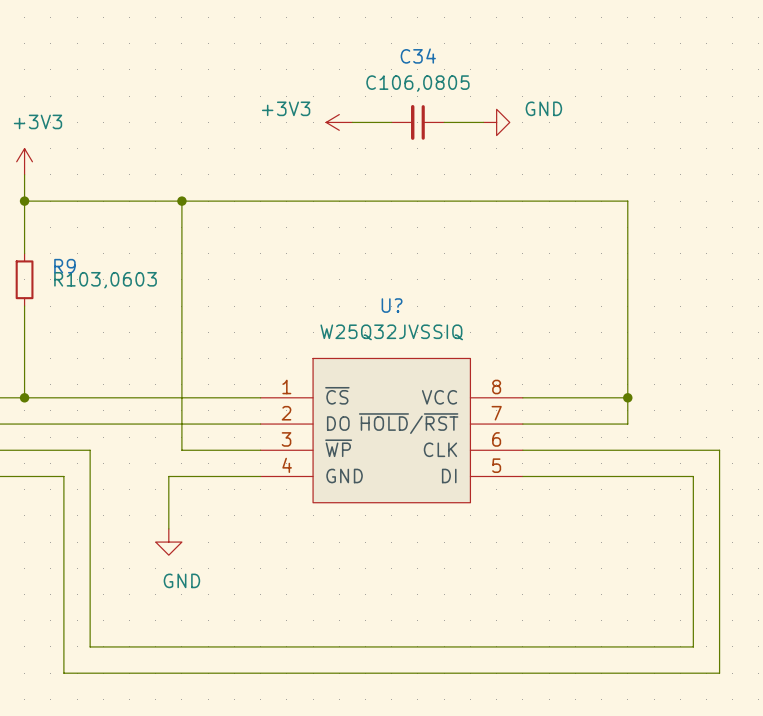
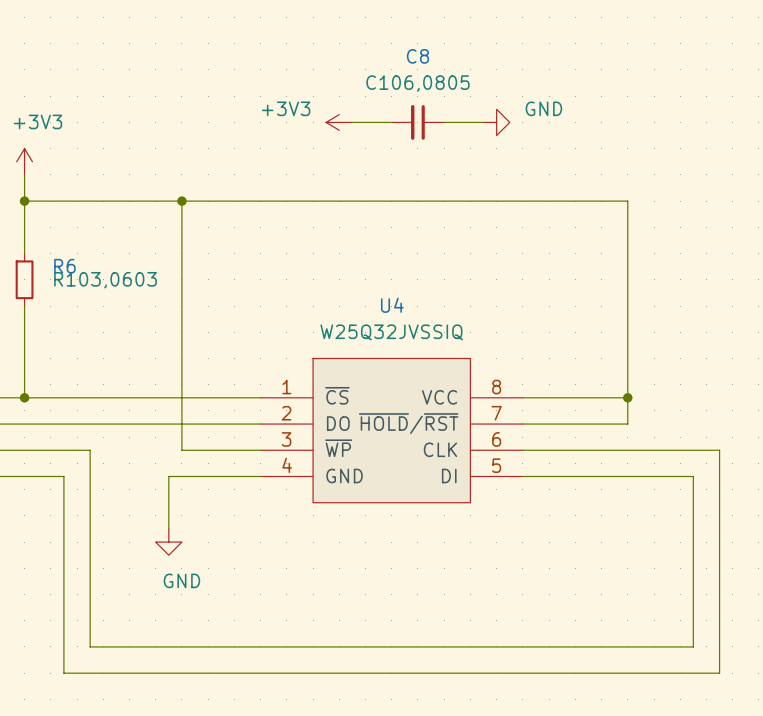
C34 name: C34 (418, 56) -> C8 (417, 56)
R9 name: R9 (64, 266) -> R6 (64, 266)
U? name: U? (392, 305) -> U4 (392, 305)

